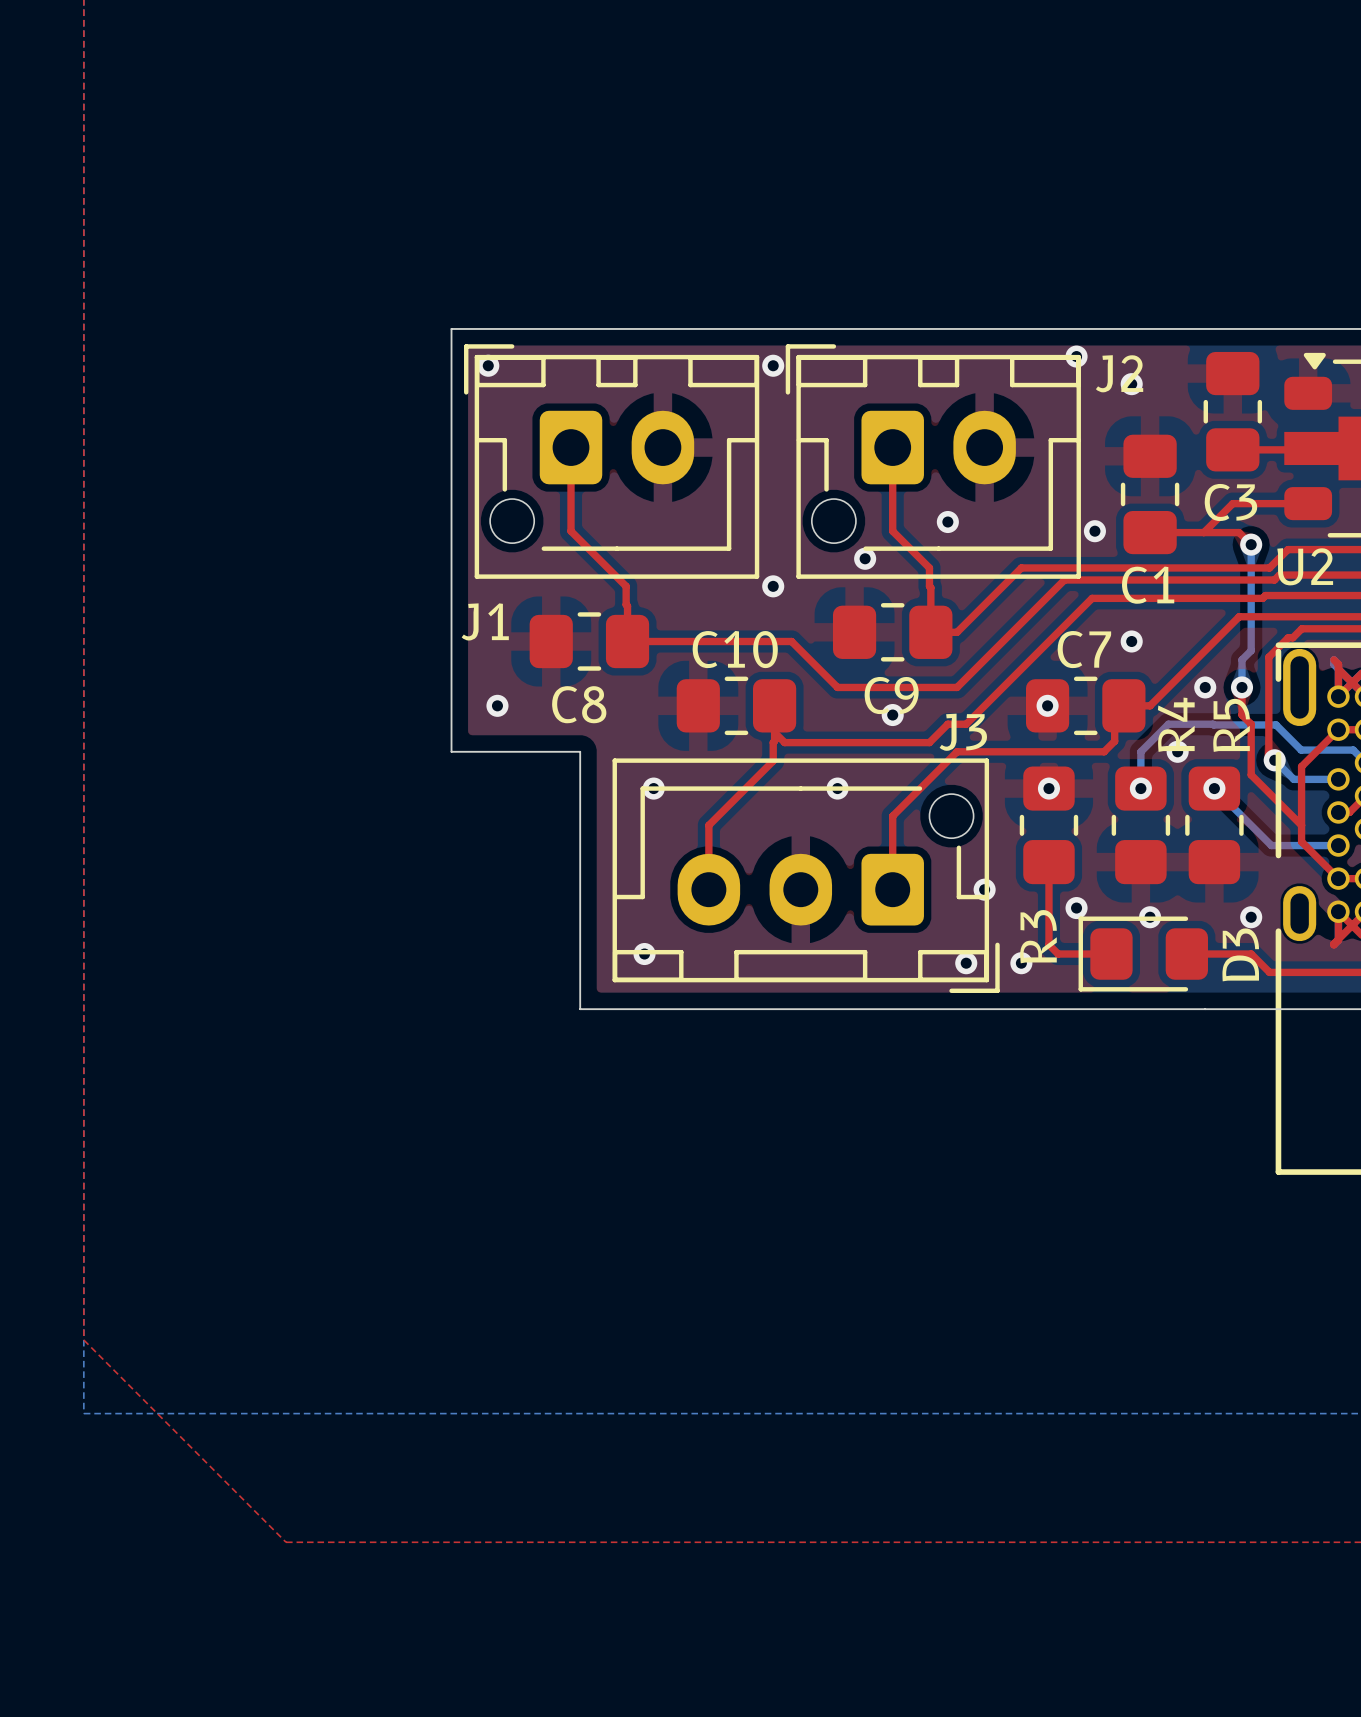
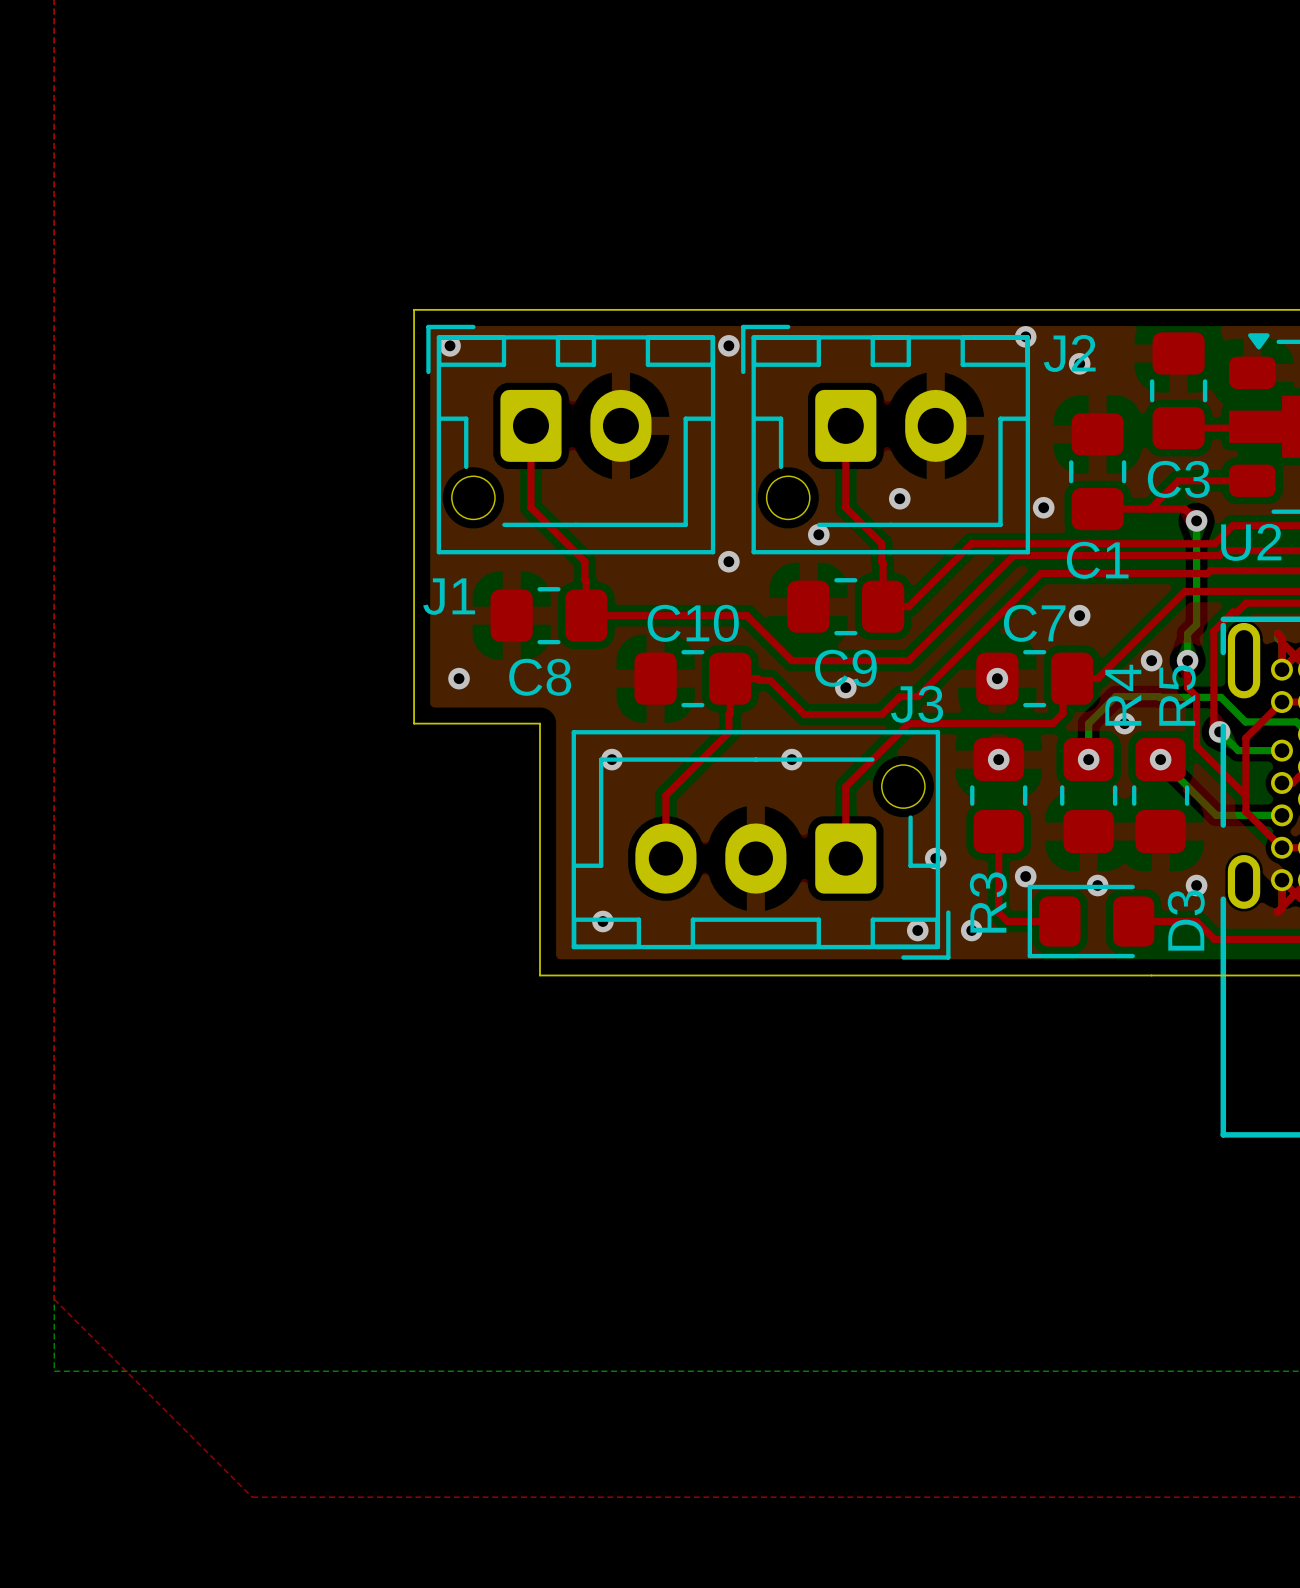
top track: (774, 732) (784, 742) (850, 742) -> (730, 678) (770, 680) (804, 714)

